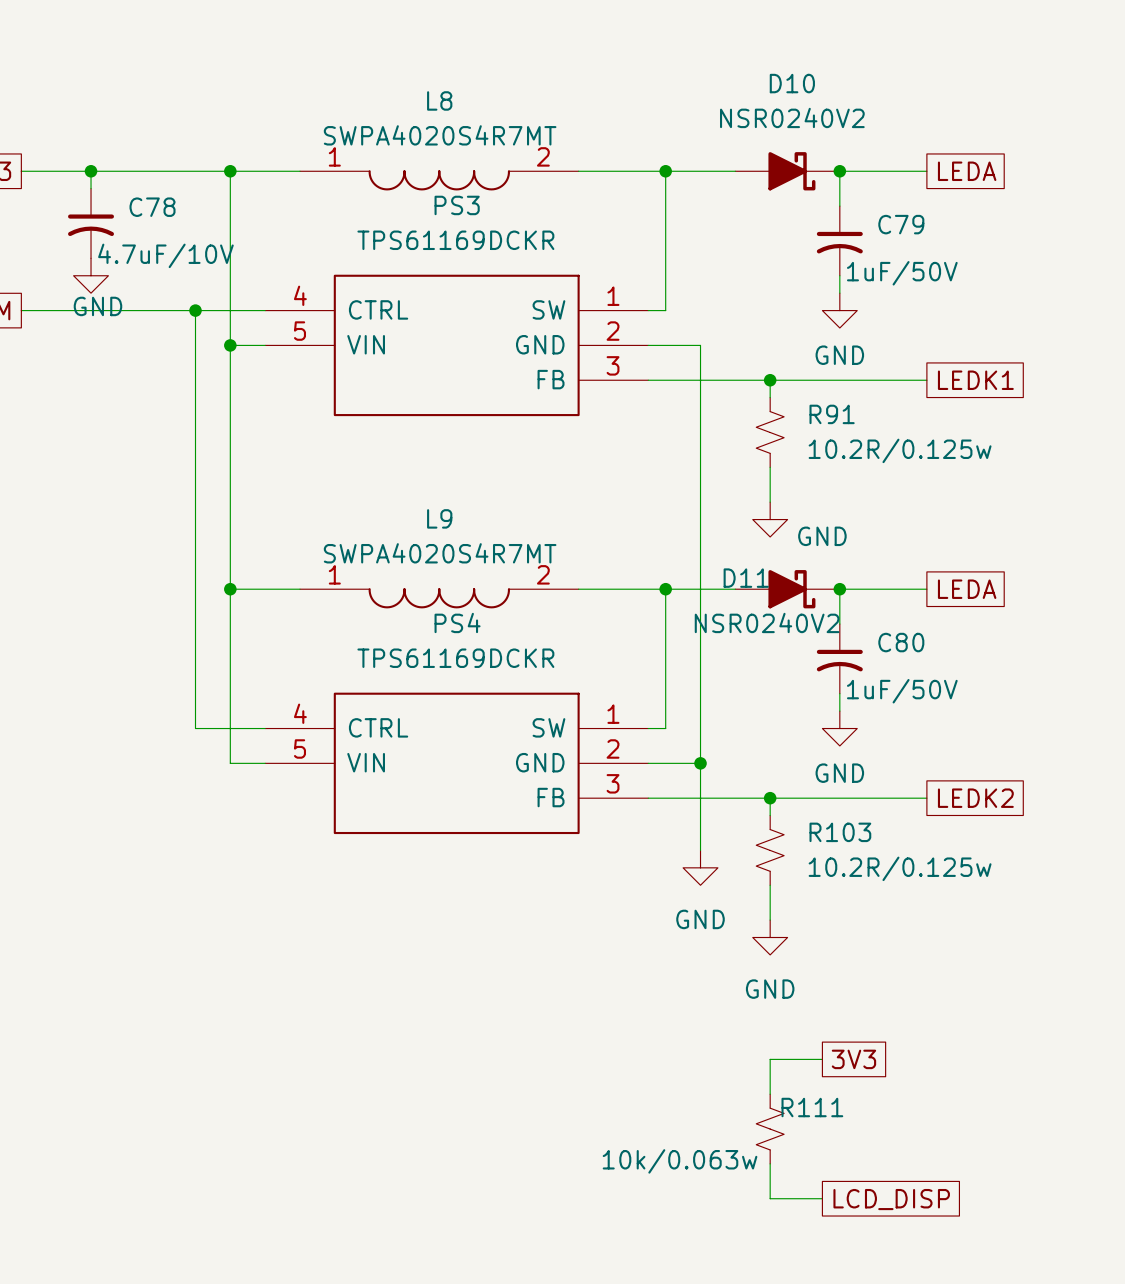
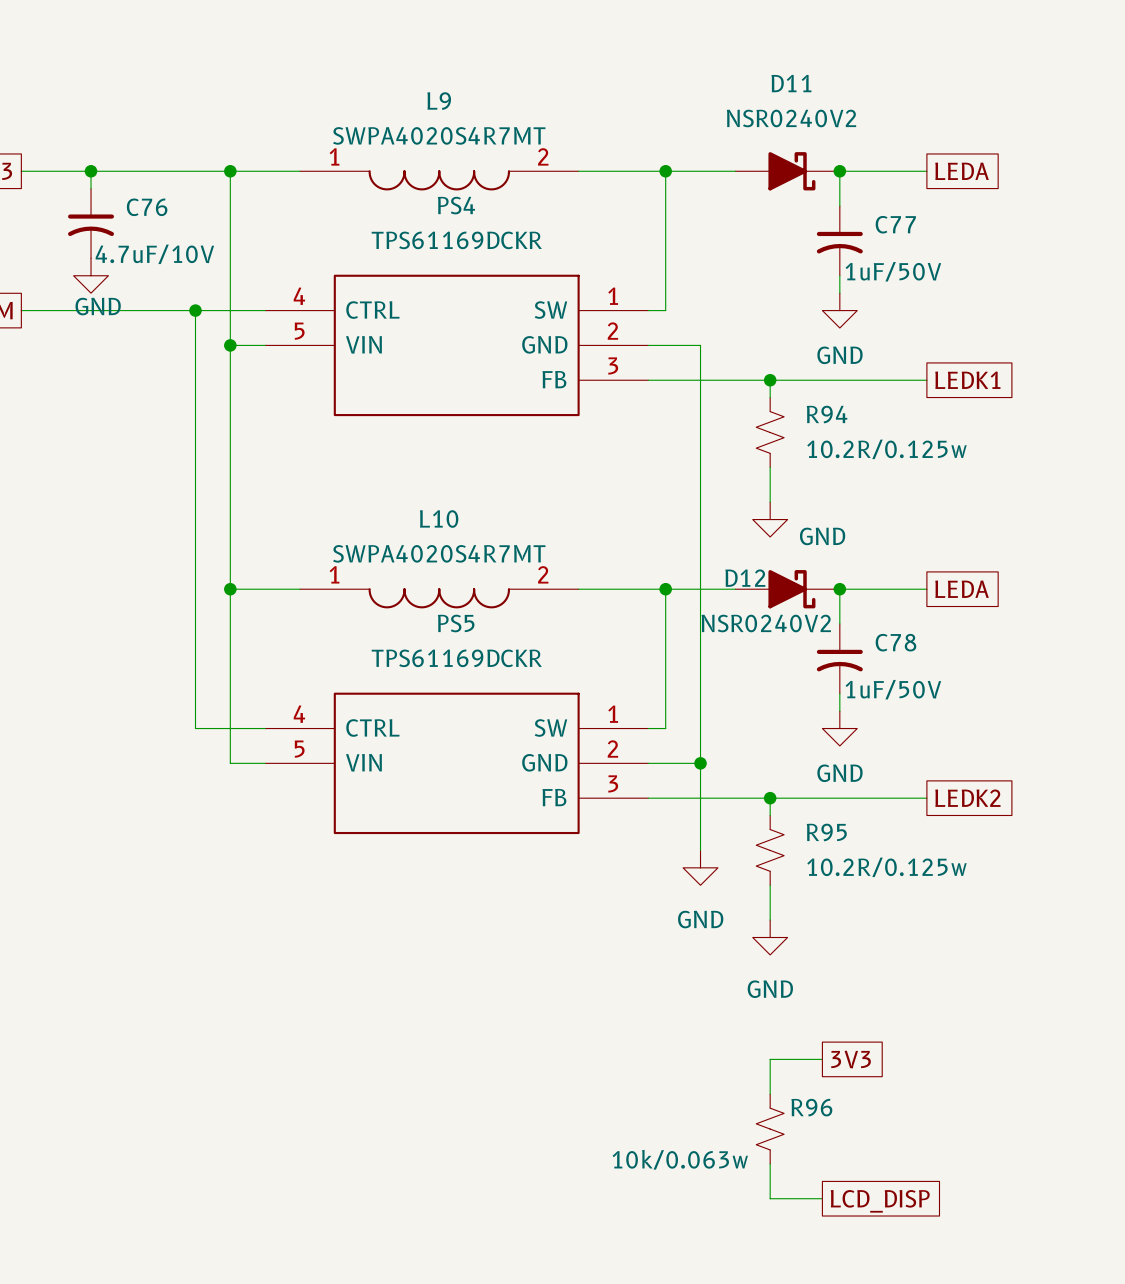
D10 name: D10 (792, 83) -> D11 (791, 83)
L8 name: L8 (439, 100) -> L9 (439, 101)
PS3 name: PS3 (457, 205) -> PS4 (456, 205)
C78 name: C78 (152, 207) -> C76 (147, 207)
C79 name: C79 (901, 224) -> C77 (895, 224)
R91 name: R91 (832, 414) -> R94 (827, 414)
L9 name: L9 (439, 518) -> L10 (439, 519)
D11 name: D11 (746, 578) -> D12 (745, 578)
PS4 name: PS4 (457, 622) -> PS5 (456, 623)
C80 name: C80 (901, 642) -> C78 (895, 642)
R103 name: R103 (840, 832) -> R95 (826, 832)
R111 name: R111 (812, 1107) -> R96 (811, 1107)

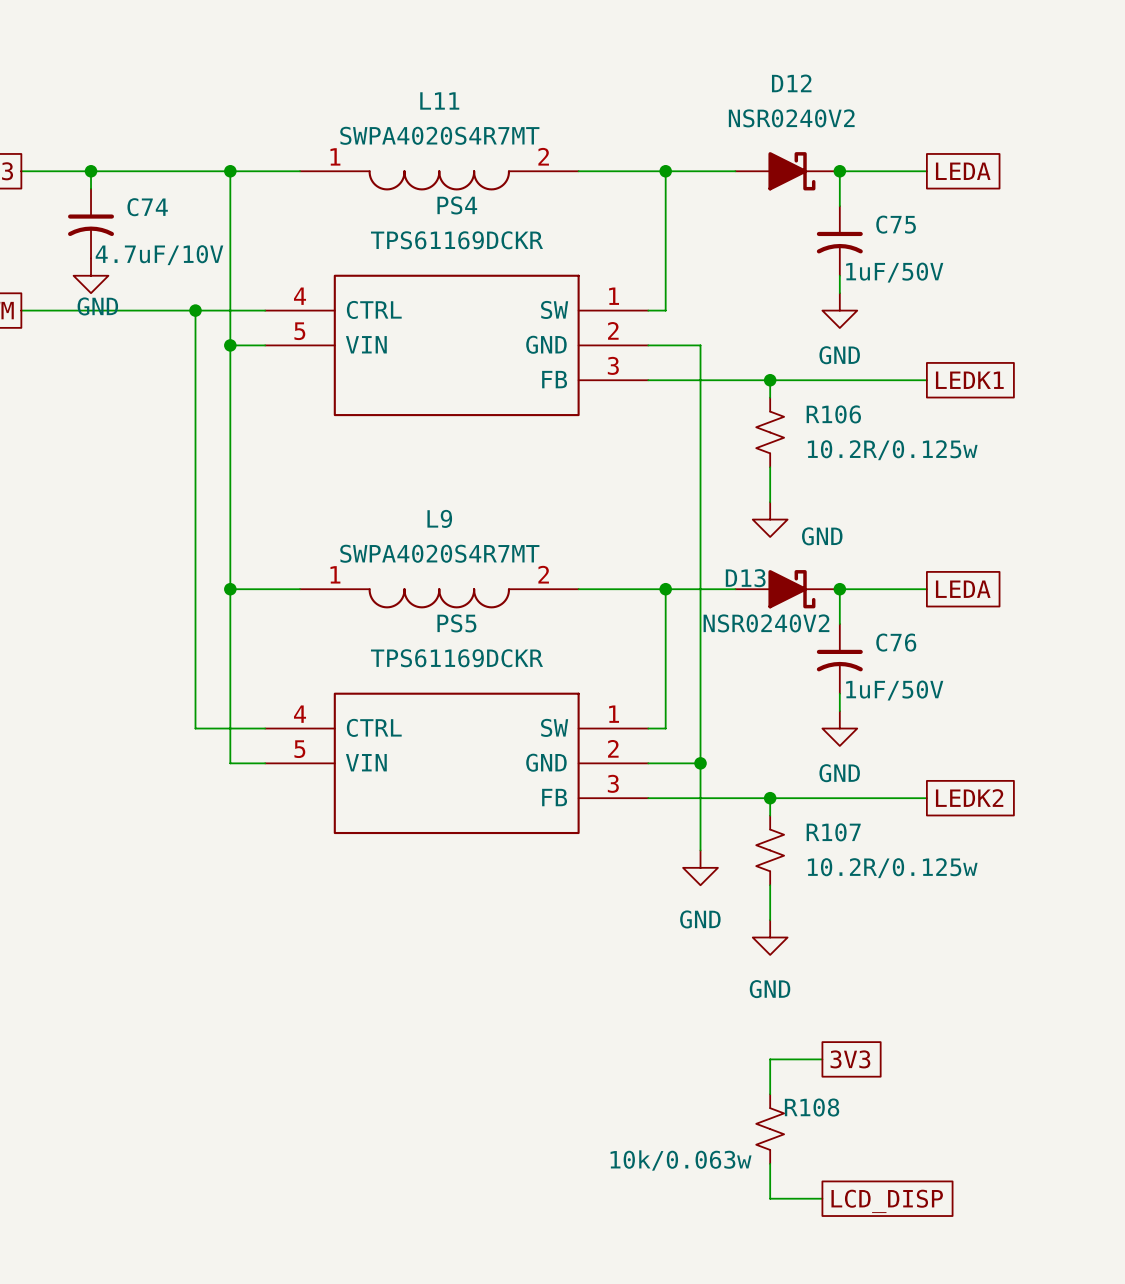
D11 name: D11 (791, 83) -> D12 (791, 83)
L9 name: L9 (439, 101) -> L11 (439, 100)
C76 name: C76 (147, 207) -> C74 (147, 207)
C77 name: C77 (895, 224) -> C75 (896, 224)
R94 name: R94 (827, 414) -> R106 (833, 414)
L10 name: L10 (439, 519) -> L9 (439, 518)
D12 name: D12 (745, 578) -> D13 (745, 578)
C78 name: C78 (895, 642) -> C76 (896, 642)
R95 name: R95 (826, 832) -> R107 (833, 832)
R96 name: R96 (811, 1107) -> R108 (812, 1107)

